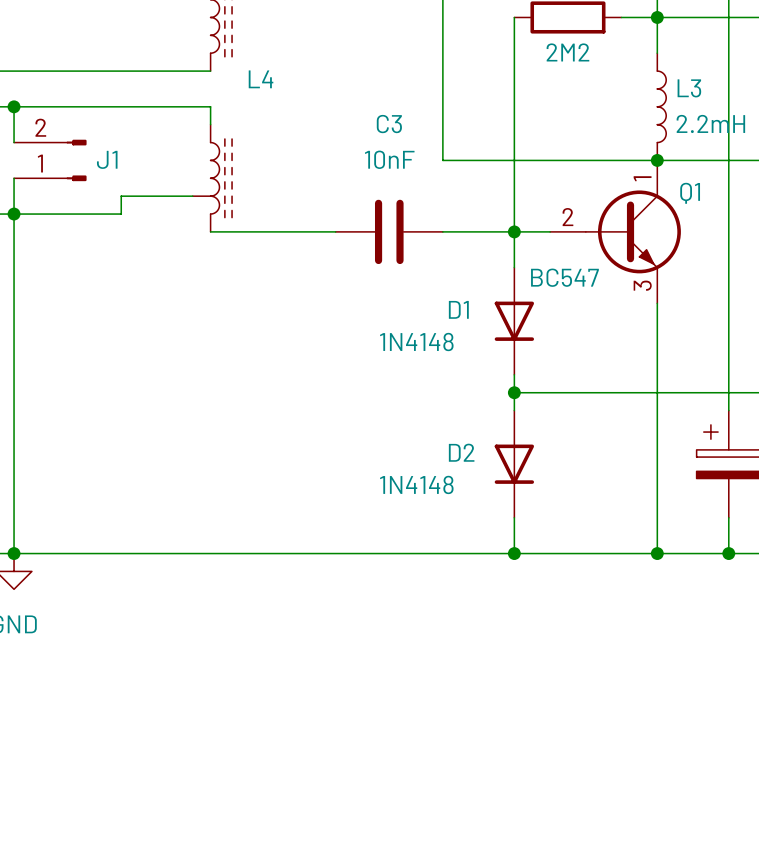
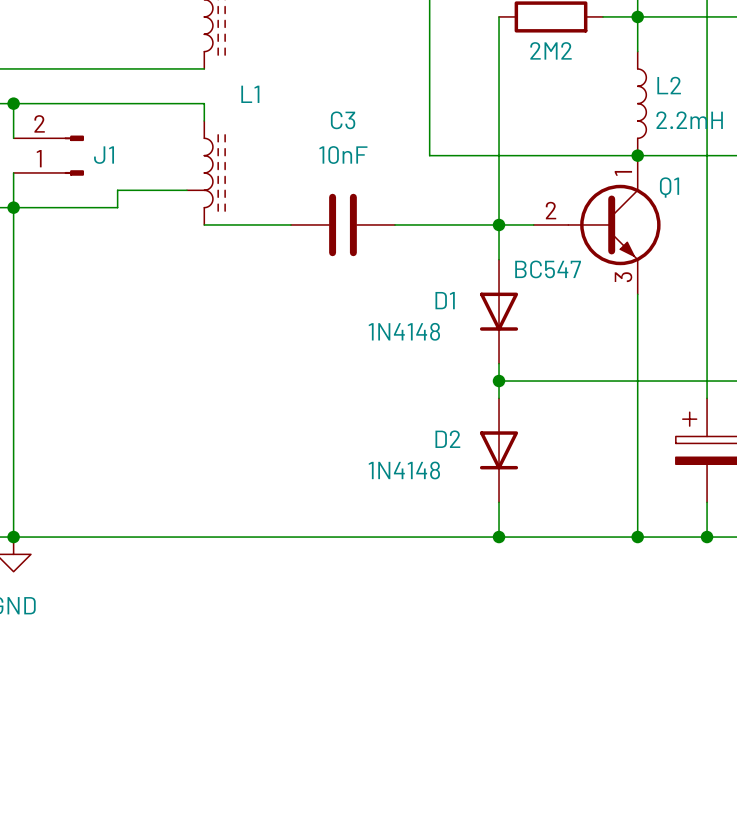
L4 name: L4 (261, 79) -> L1 (250, 94)
L3 name: L3 (689, 88) -> L2 (669, 85)
C3 position: (389, 231) -> (342, 224)

